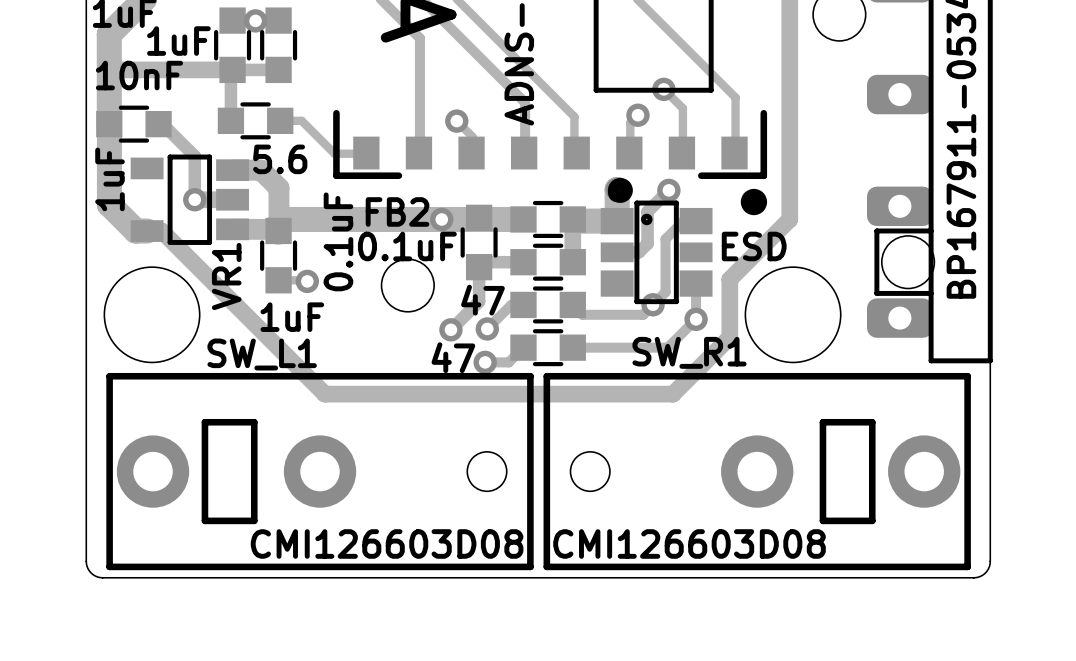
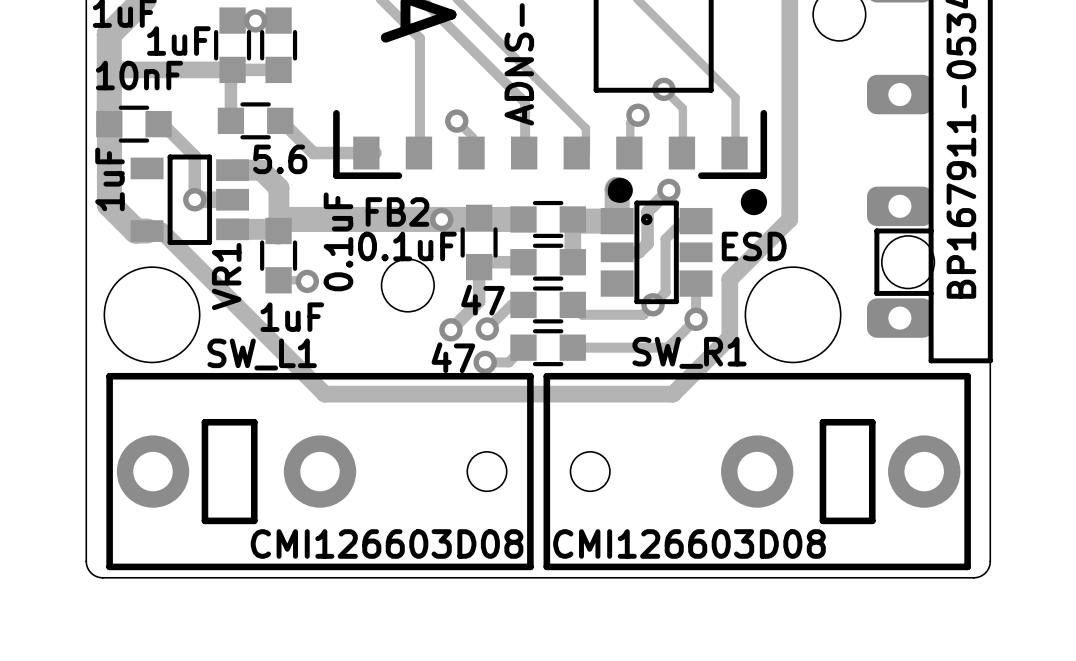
track: (574, 116) (574, 141) -> (574, 116) (585, 128) (585, 153)
track: (280, 120) (301, 120) (334, 153) (367, 153) -> (281, 120) (313, 153) (375, 153)

